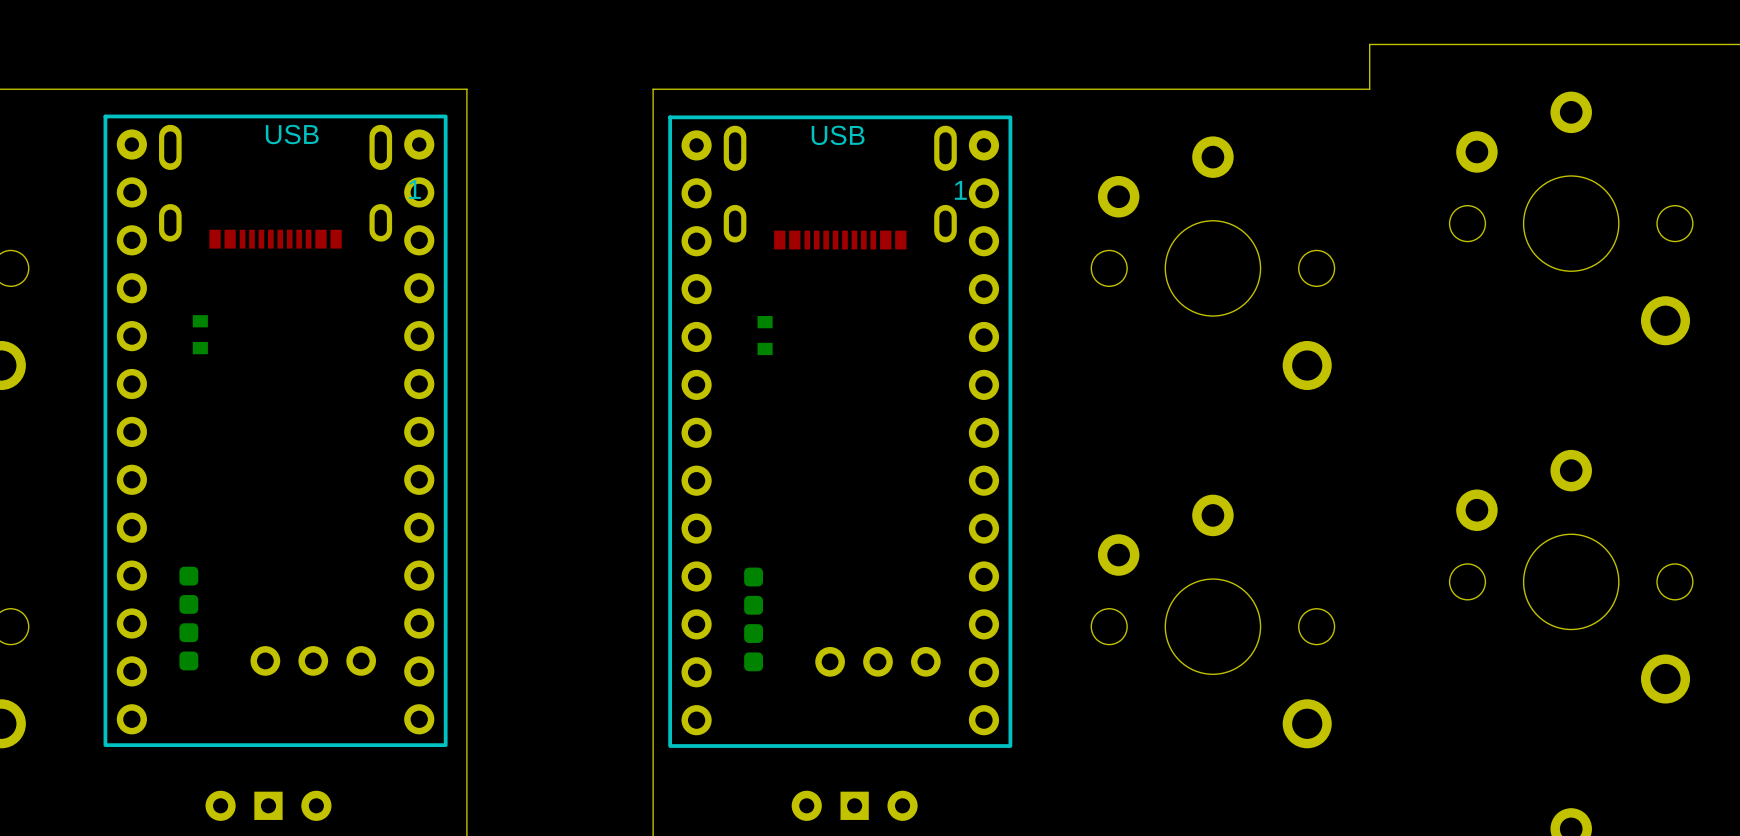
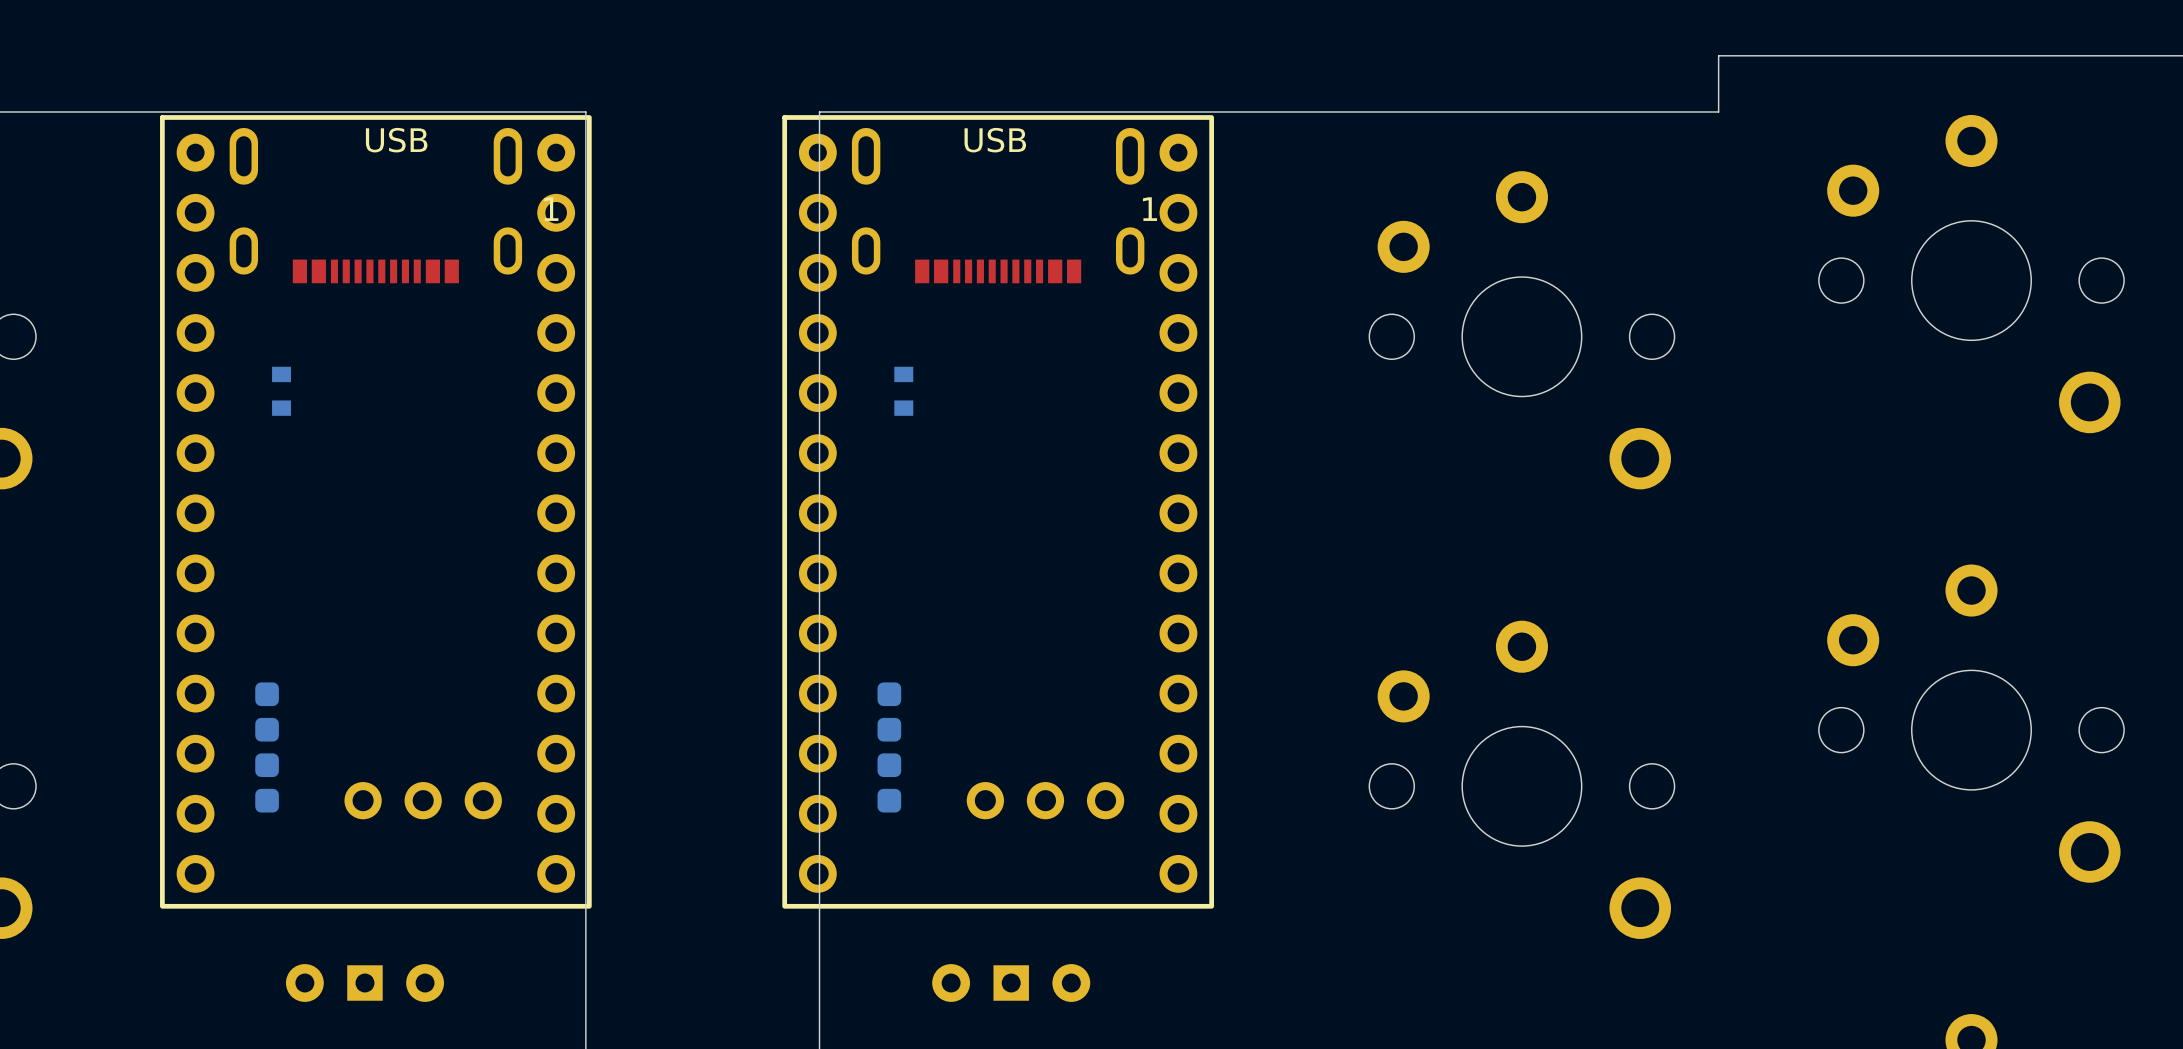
part position: (275, 430) -> (375, 511)
part position: (840, 431) -> (998, 511)
part position: (268, 805) -> (364, 983)
part position: (854, 805) -> (1011, 983)

